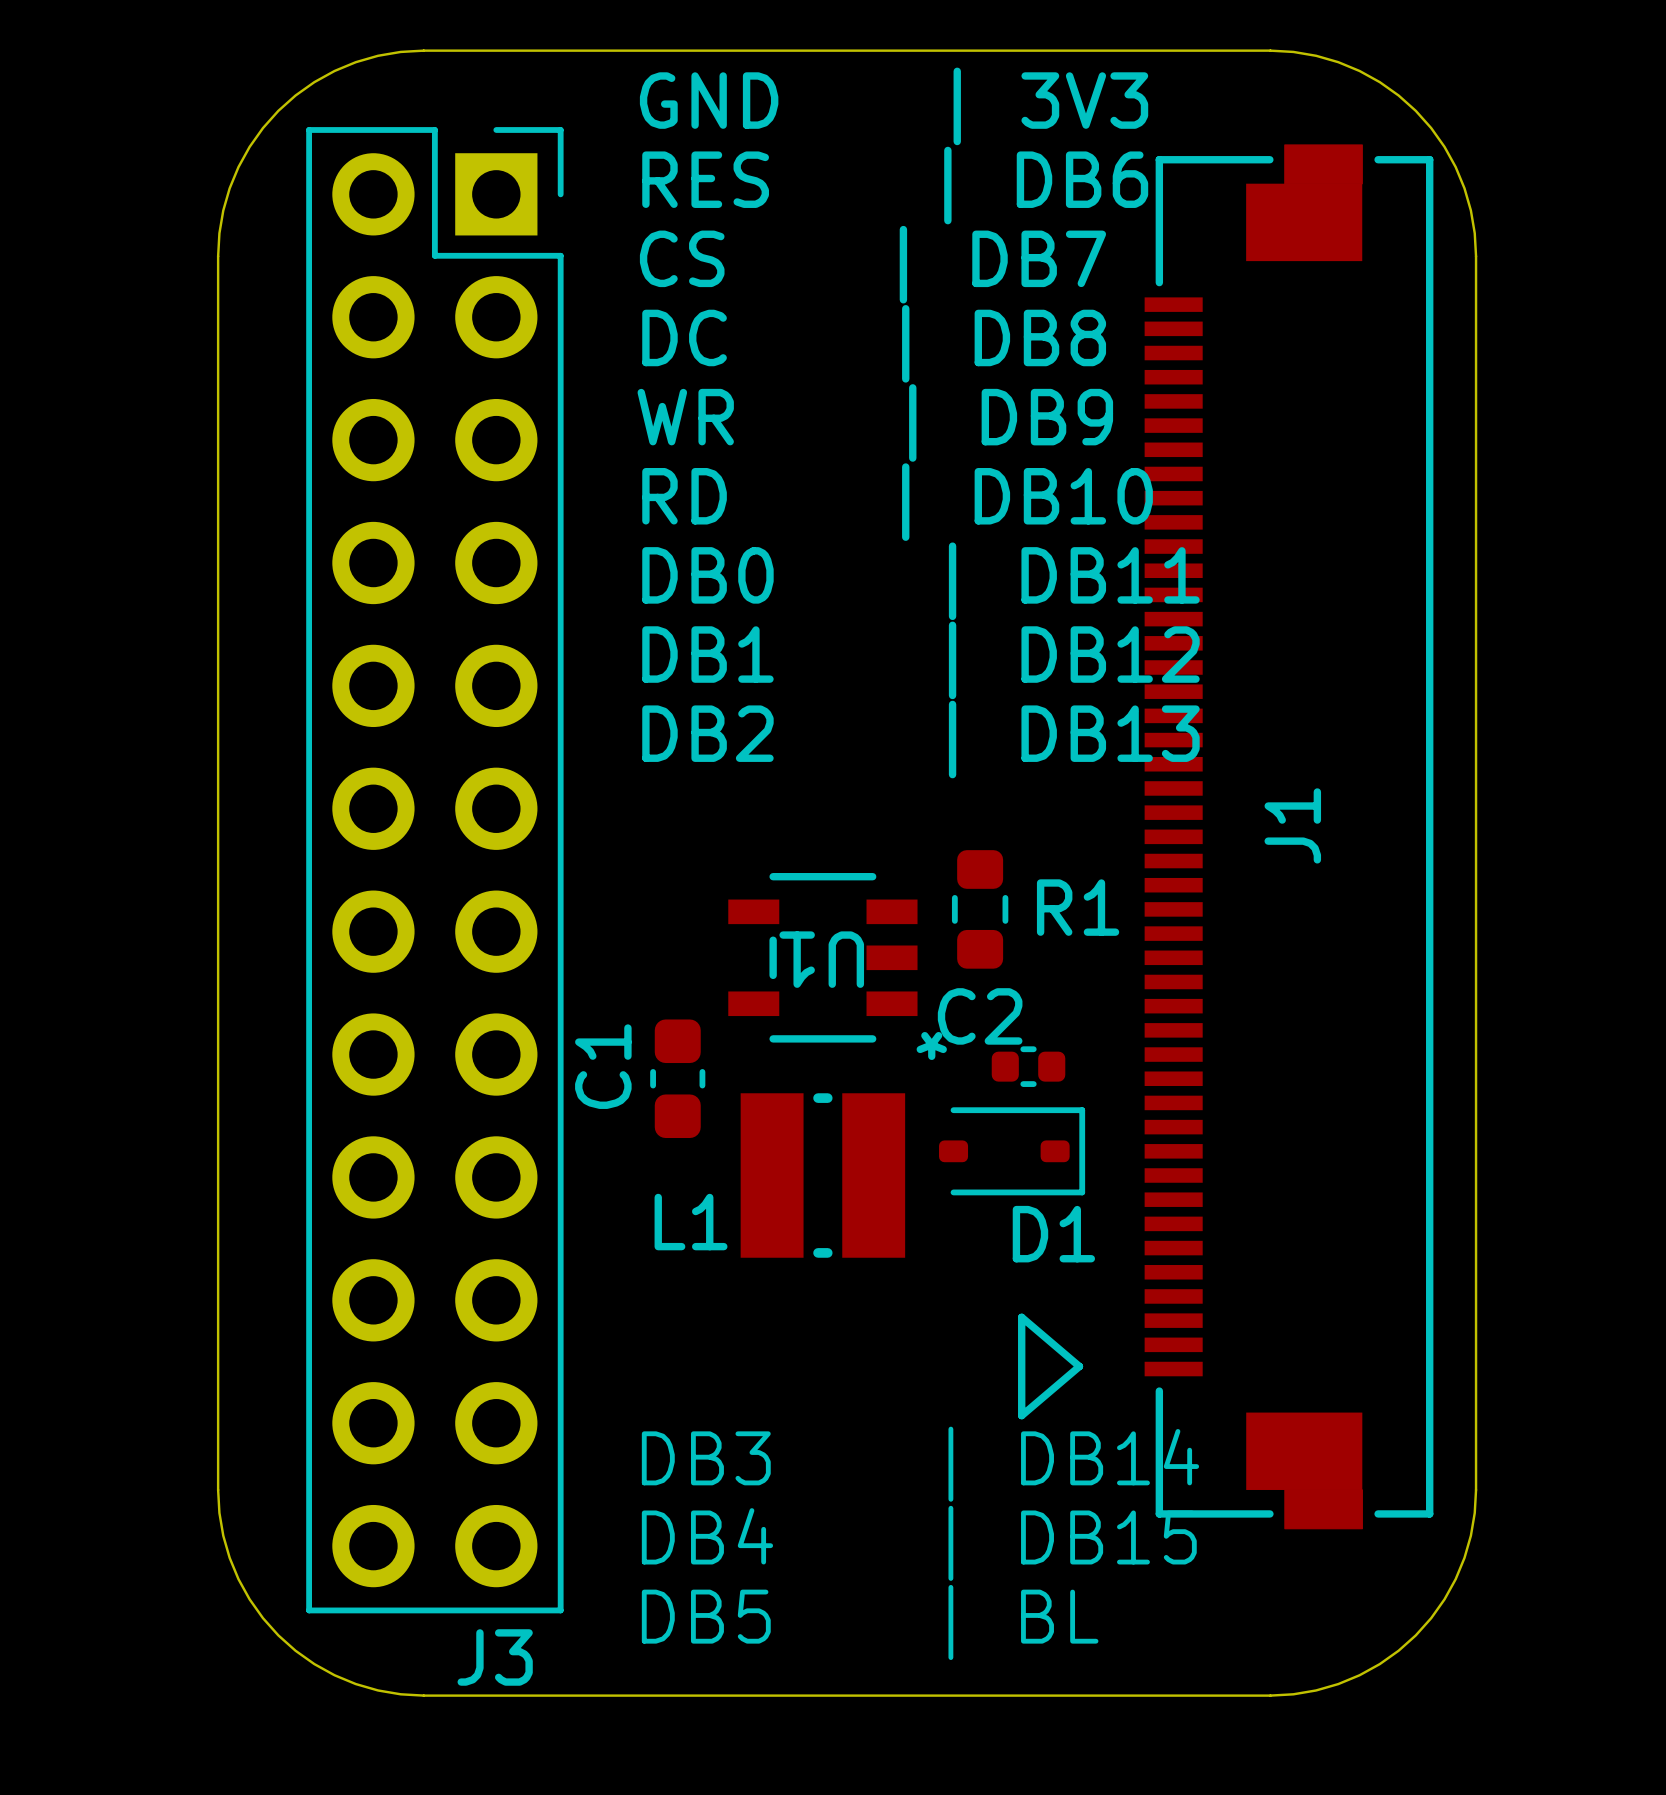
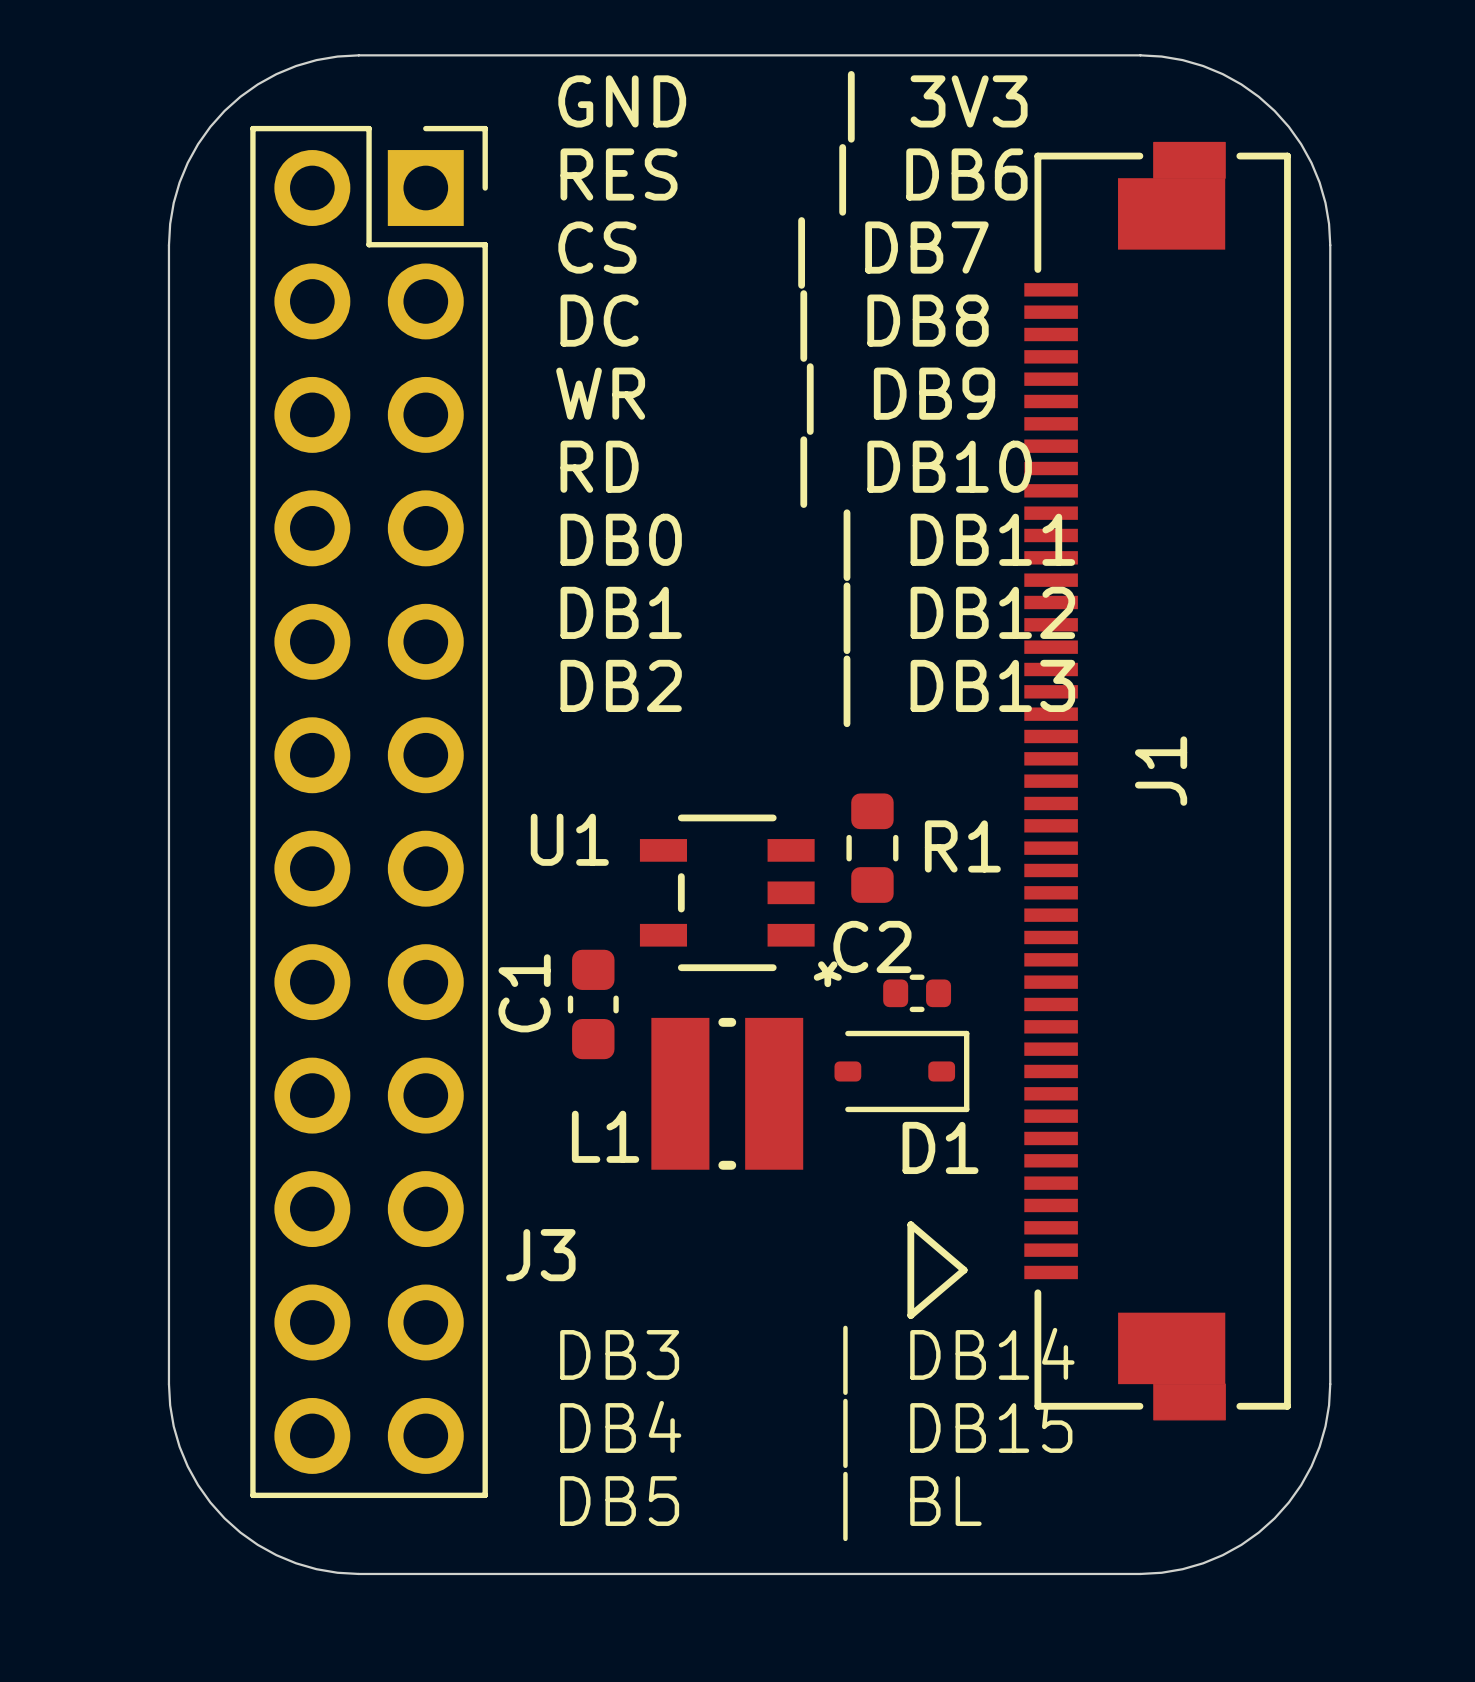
U1 name rotation: 0° (821, 959) -> 180° (569, 839)
U1 name position: U1 (821, 959) -> U1 (569, 839)
J3 name position: J3 (495, 1657) -> J3 (540, 1255)

